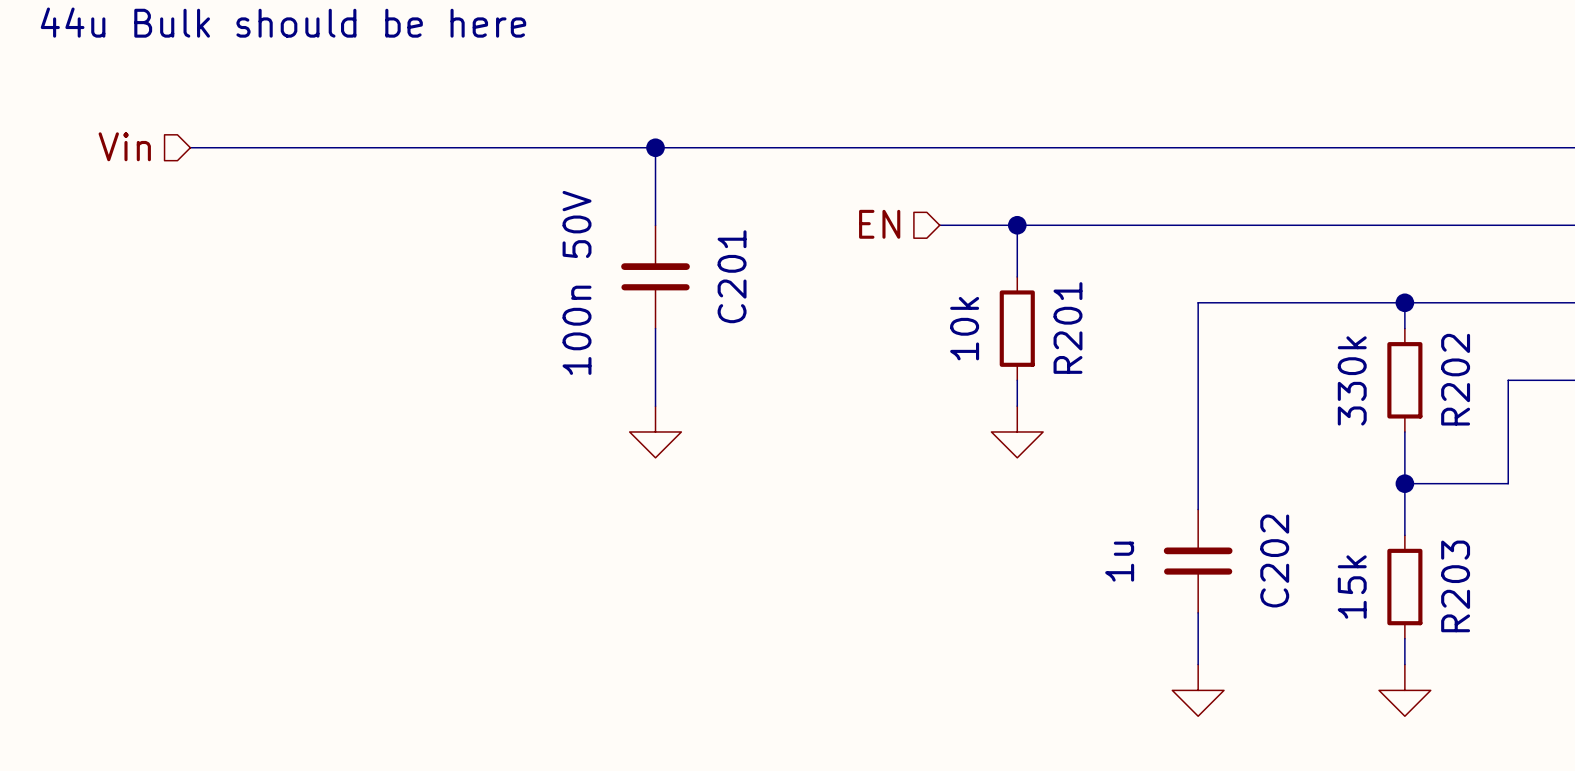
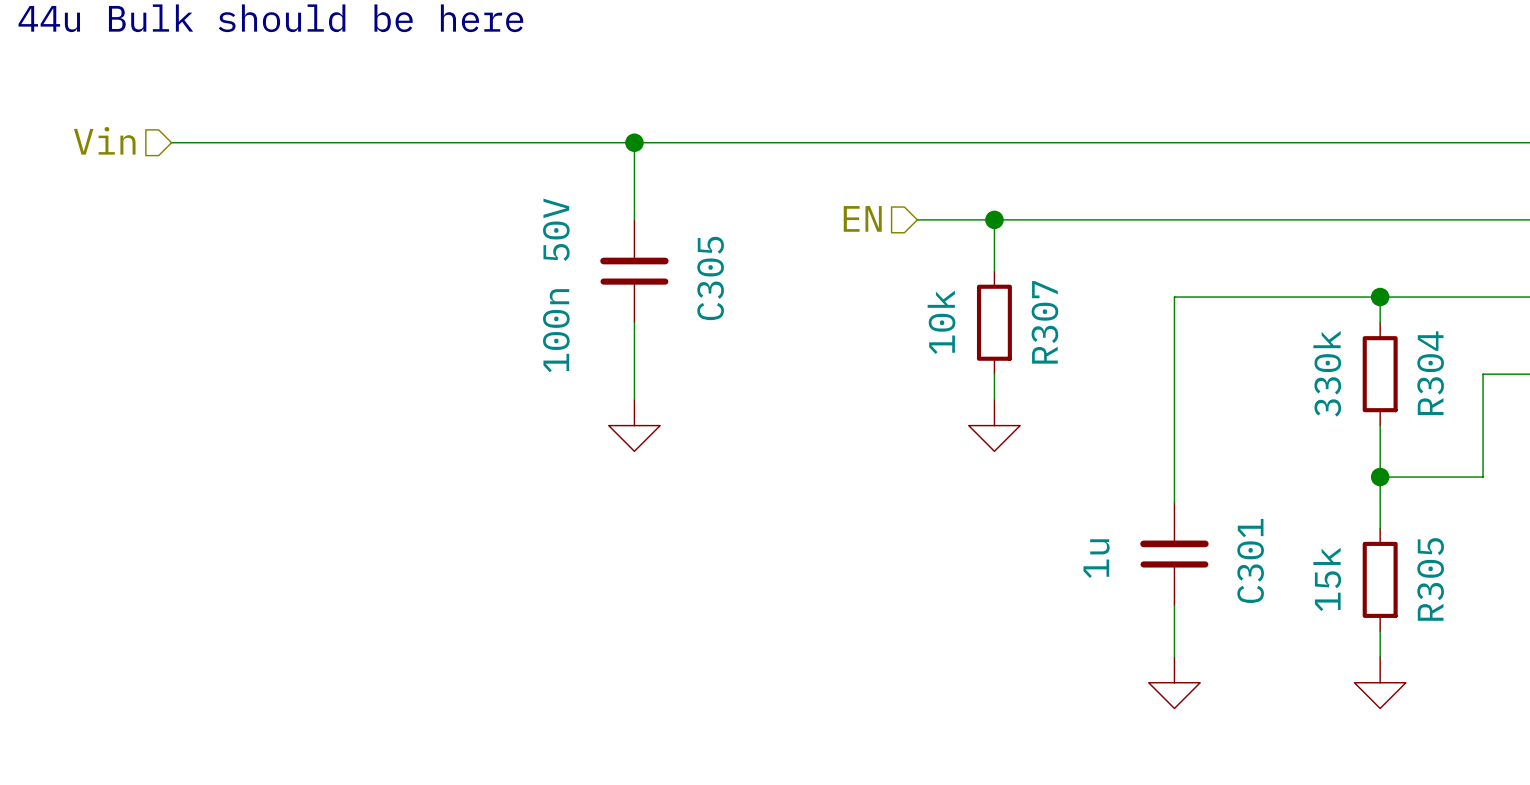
C201 name: C201 (732, 276) -> C305 (710, 278)
R201 name: R201 (1067, 328) -> R307 (1044, 322)
R202 name: R202 (1455, 379) -> R304 (1430, 373)
C202 name: C202 (1274, 561) -> C301 (1250, 560)
R203 name: R203 (1455, 586) -> R305 (1430, 579)

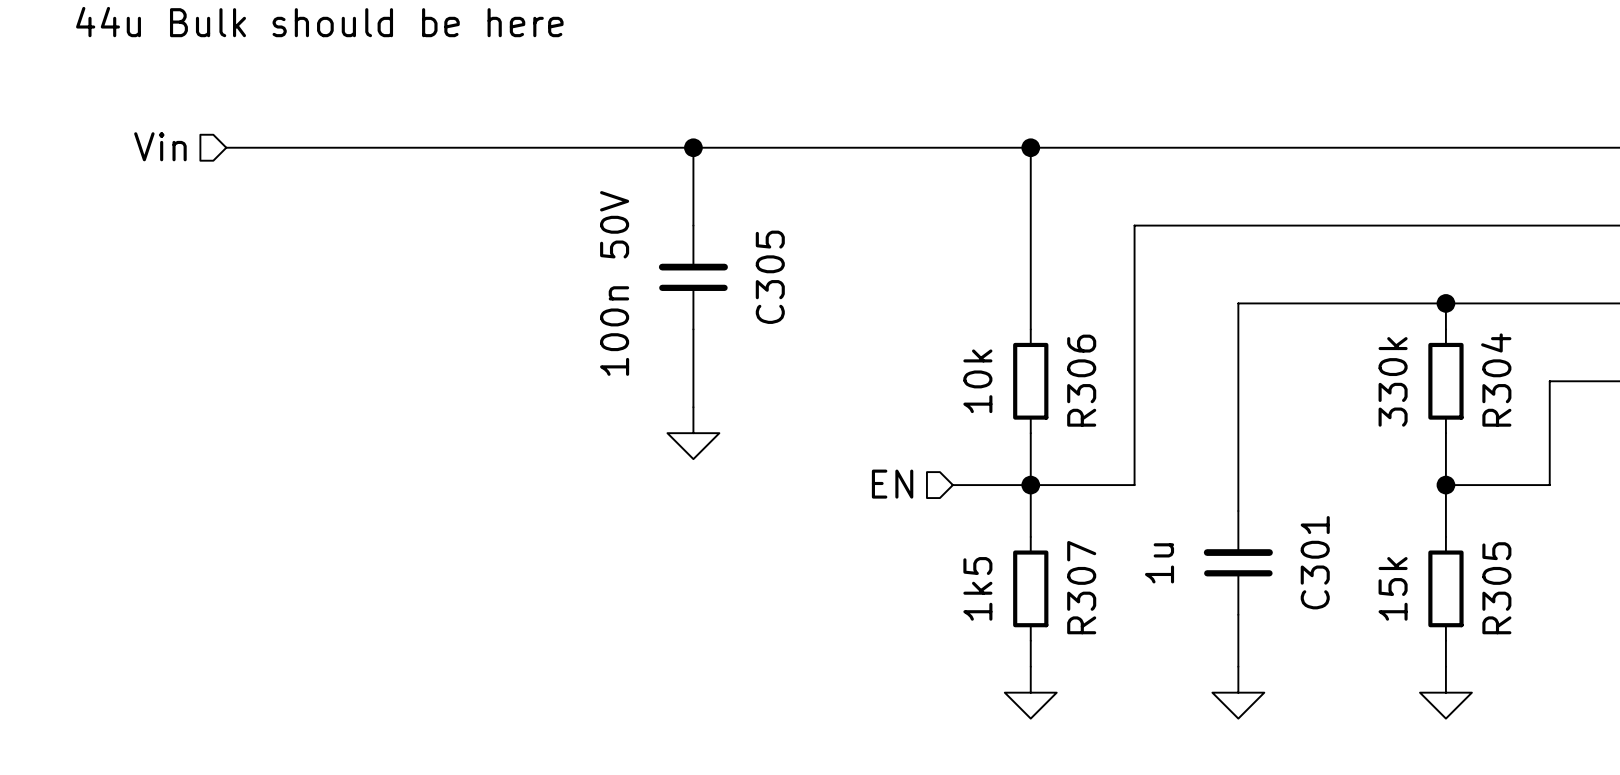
wire: none -> (1030, 147) (1030, 329)
hierarchical label position: EN (862, 218) -> EN (892, 484)
wire: (917, 219) (1071, 219) -> (952, 485) (1134, 485) (1134, 225)
wire: (994, 219) (994, 271) -> none
junction position: (994, 219) -> (1030, 147)
R307 value: 10k (941, 322) -> 1k5 (977, 588)
R307 position: (994, 322) -> (1030, 588)
R306: none -> 10k (1030, 381)
wire: (994, 374) (994, 399) -> (1030, 640) (1030, 666)
wire: none -> (1030, 433) (1030, 536)
power symbol position: (994, 425) -> (1030, 692)
junction: none -> (1030, 485)

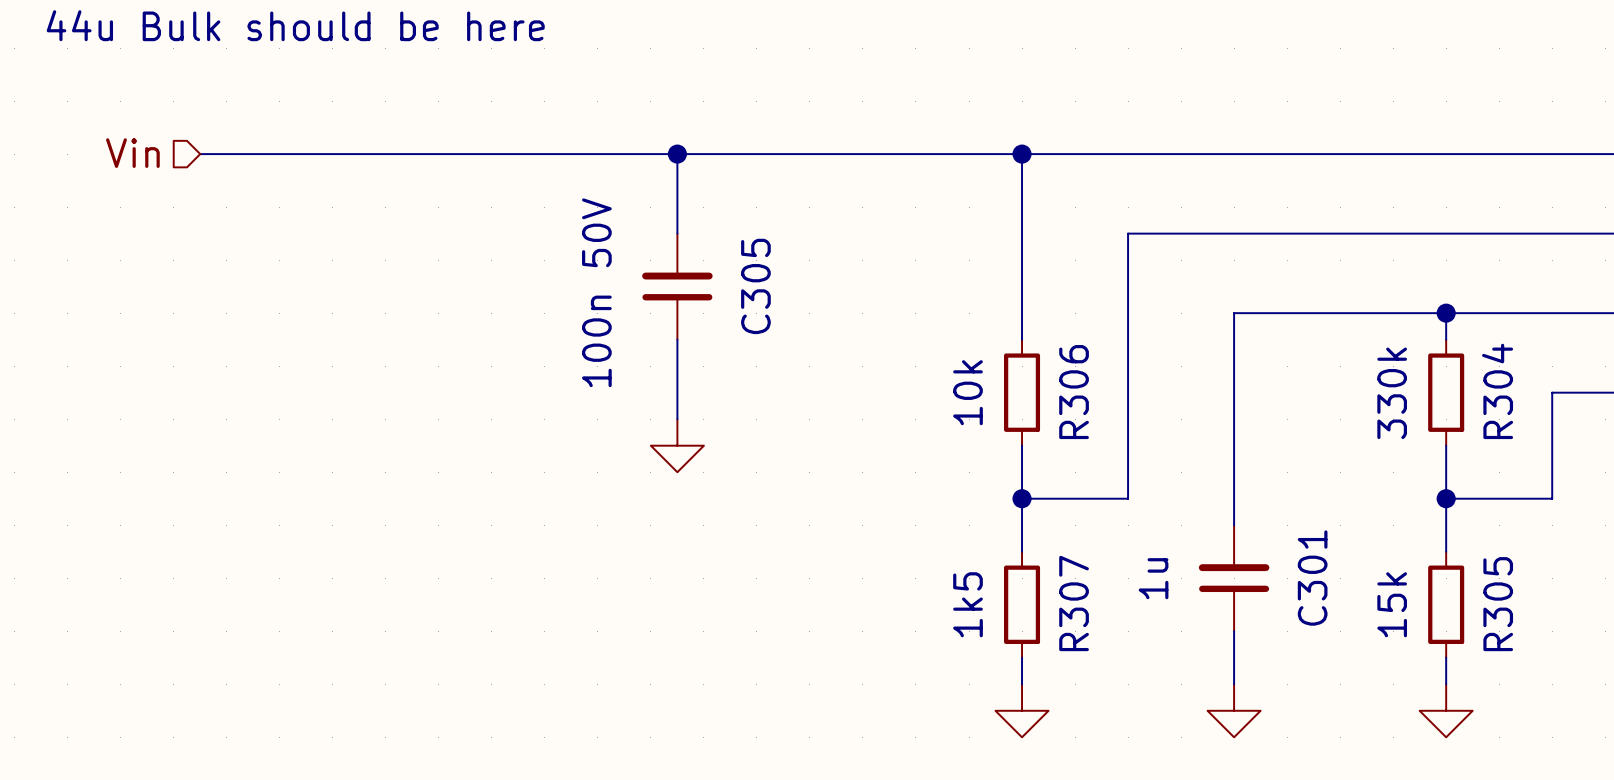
hierarchical label: EN (892, 484) -> none
wire: (952, 485) (1030, 485) -> none

